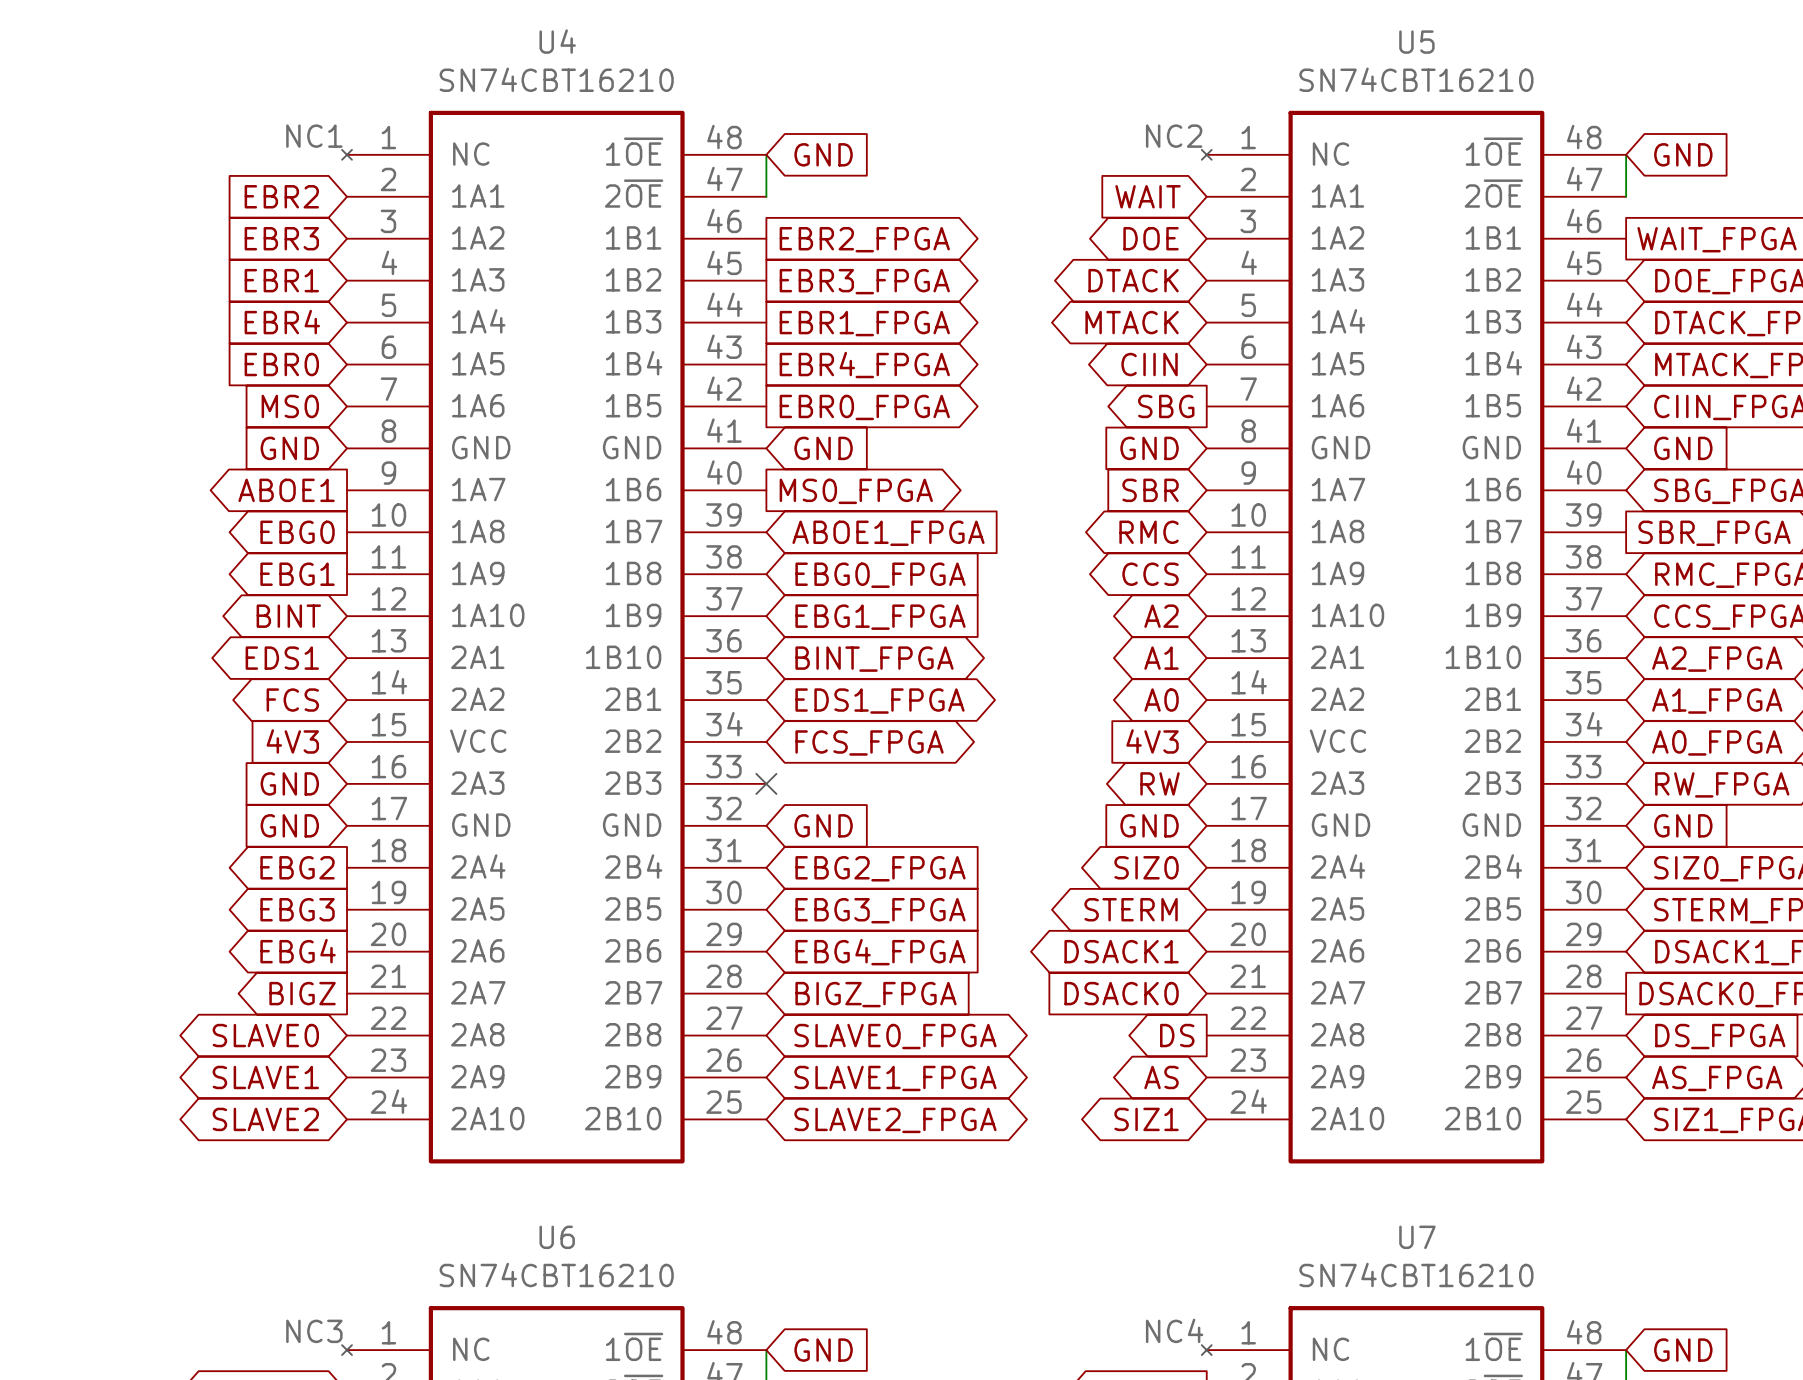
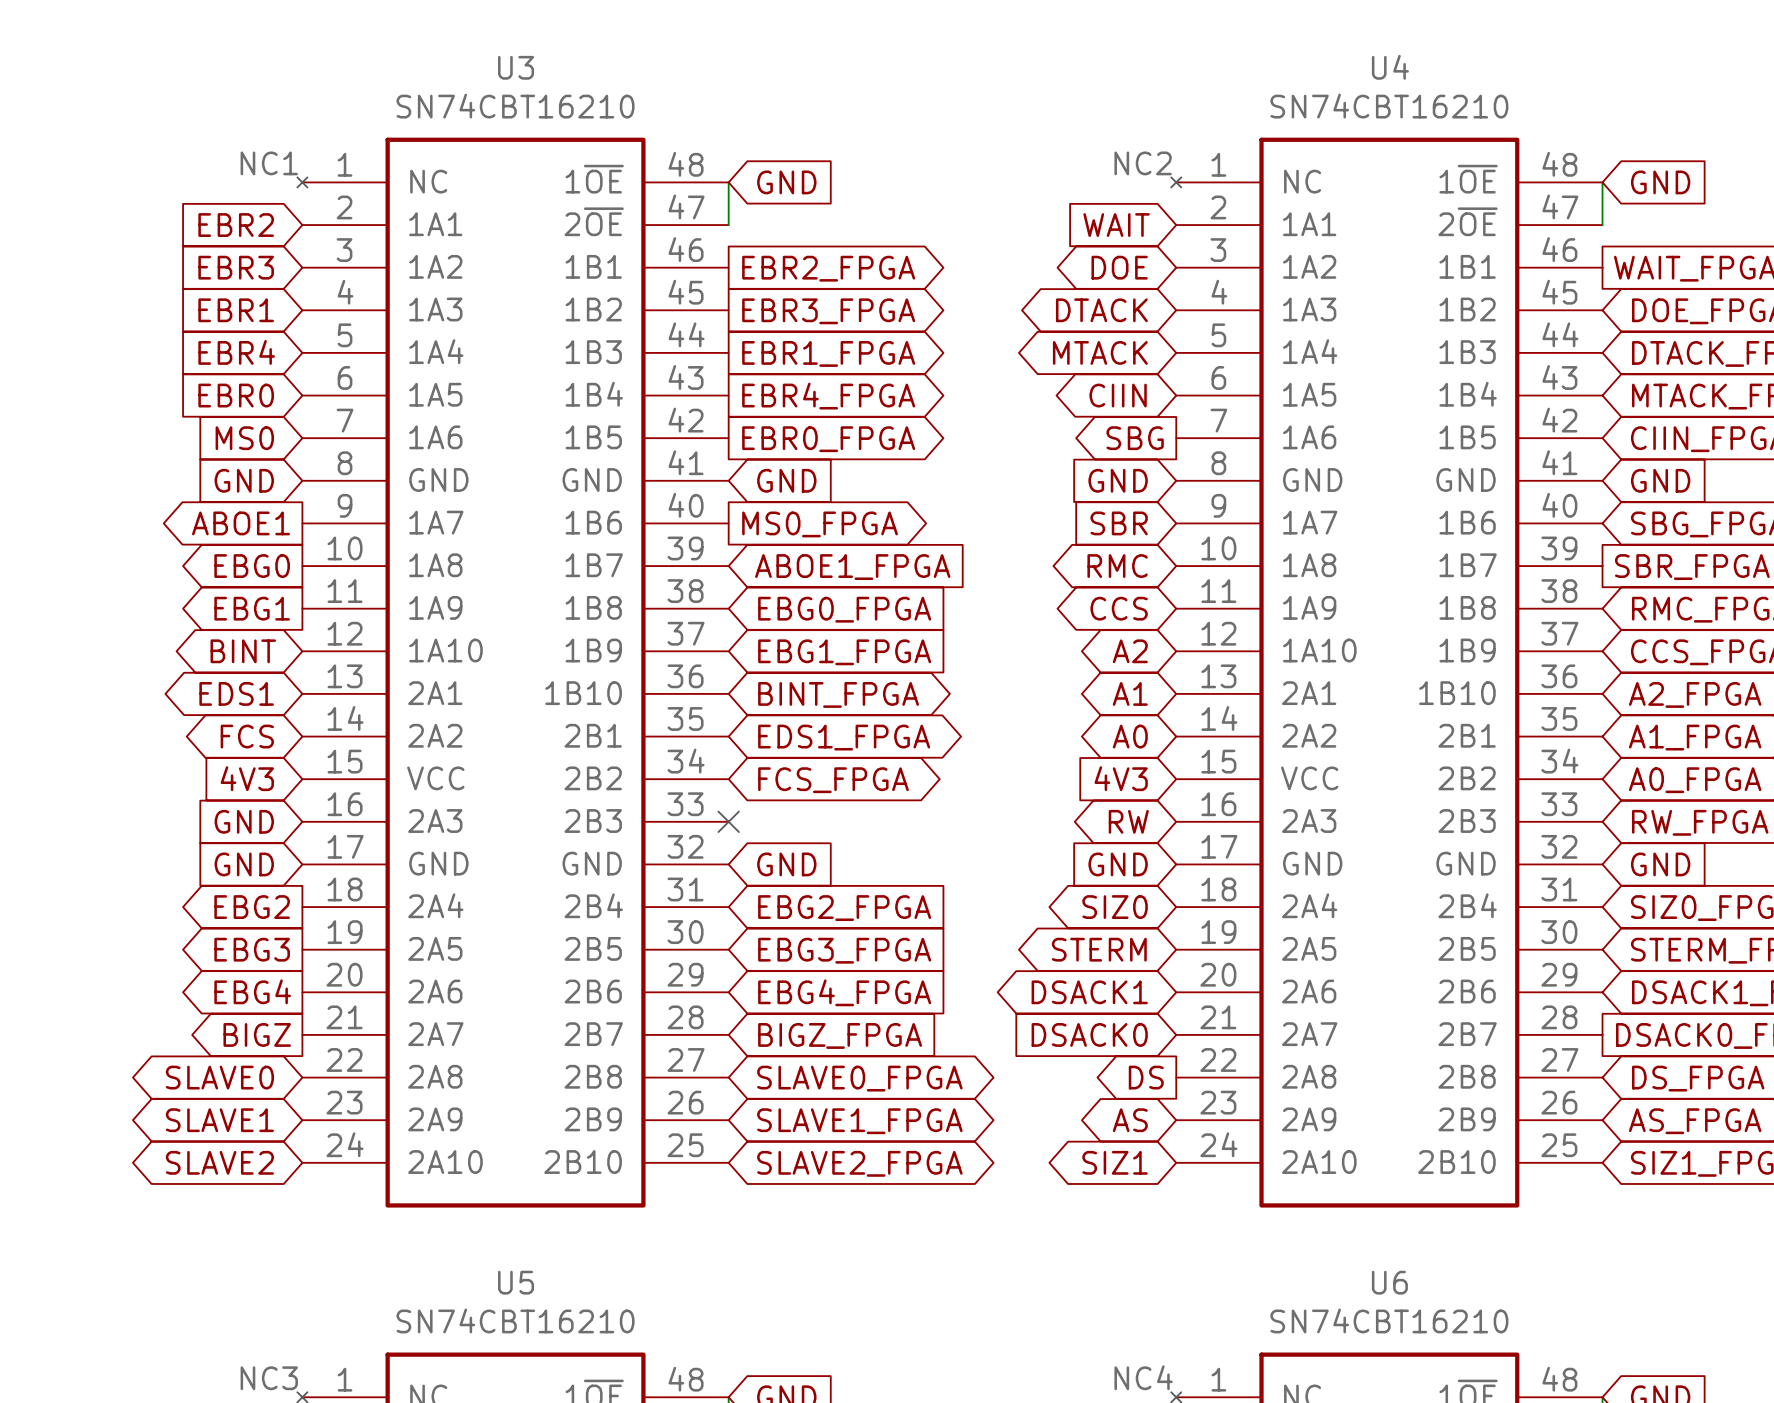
U4 name: U4 (557, 41) -> U3 (516, 67)
U5 name: U5 (1416, 42) -> U4 (1390, 67)
U6 name: U6 (557, 1237) -> U5 (516, 1282)
U7 name: U7 (1417, 1237) -> U6 (1389, 1282)

